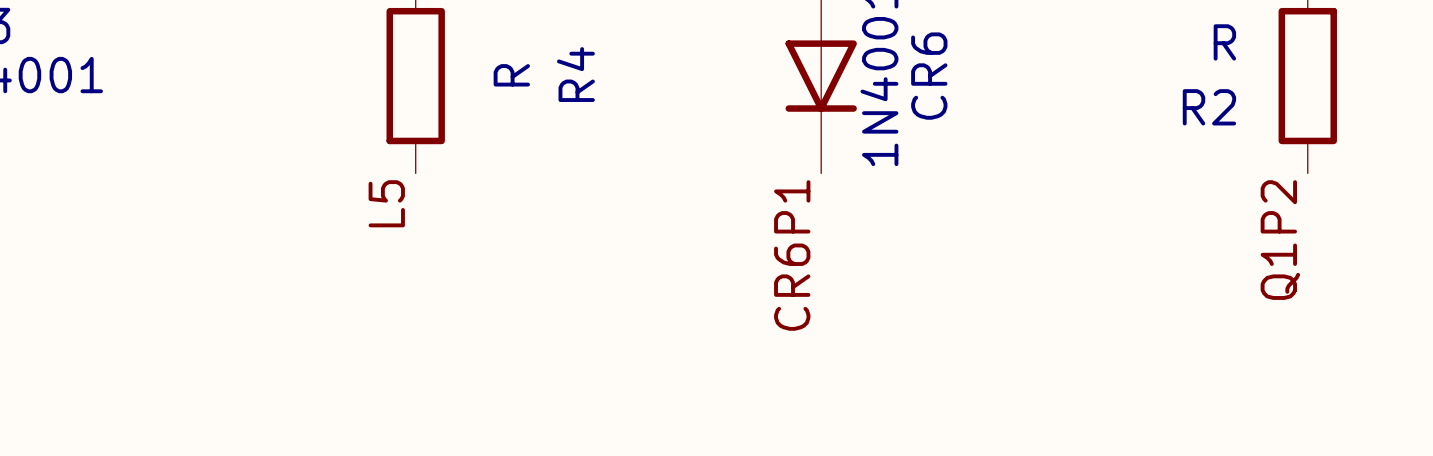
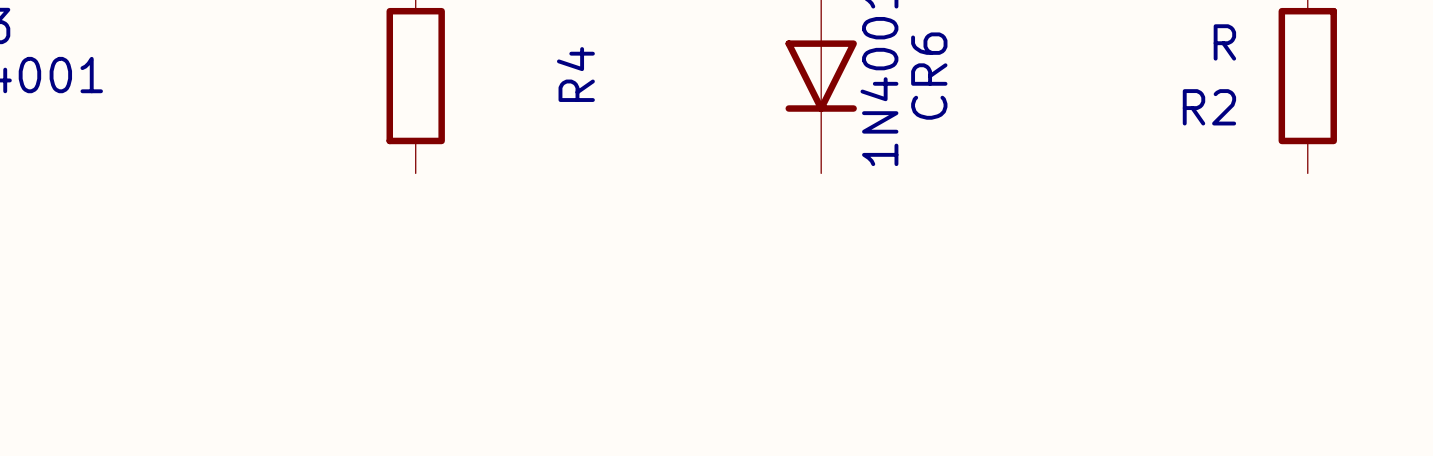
R4 value: R (511, 75) -> none
label: L5 (386, 203) -> none
label: Q1P2 (1280, 240) -> none
label: CR6P1 (792, 255) -> none

